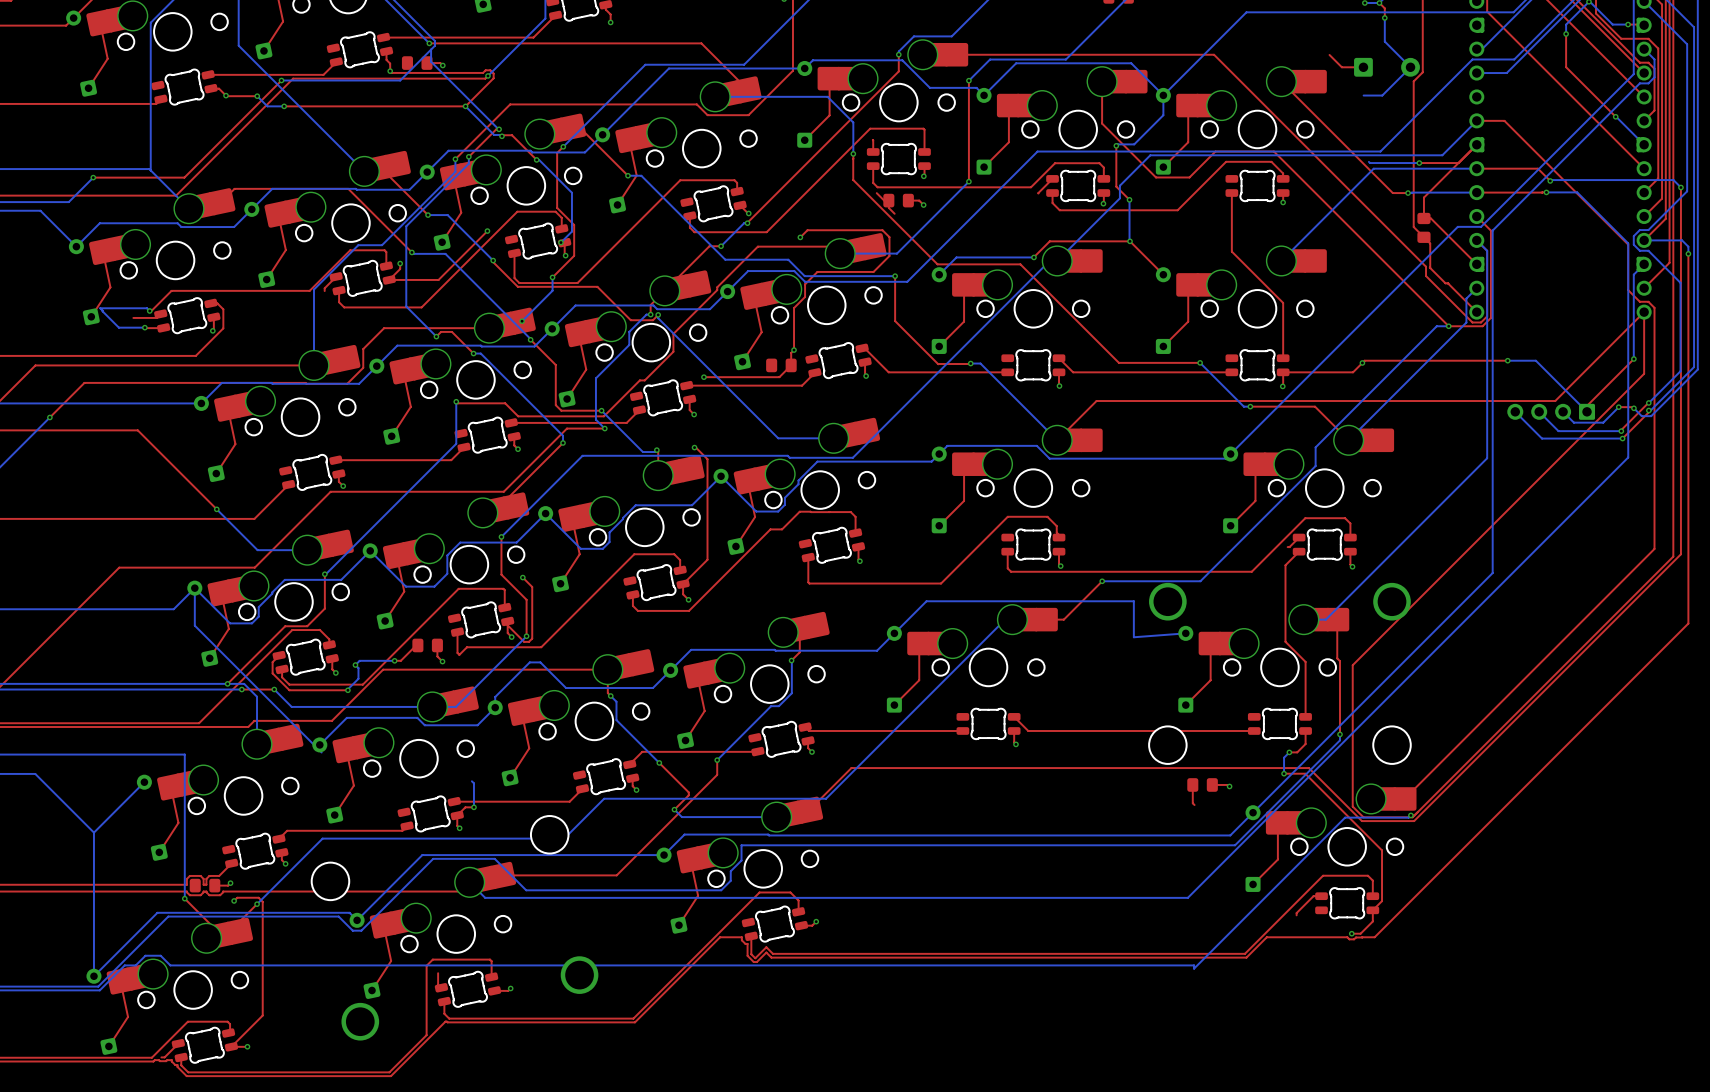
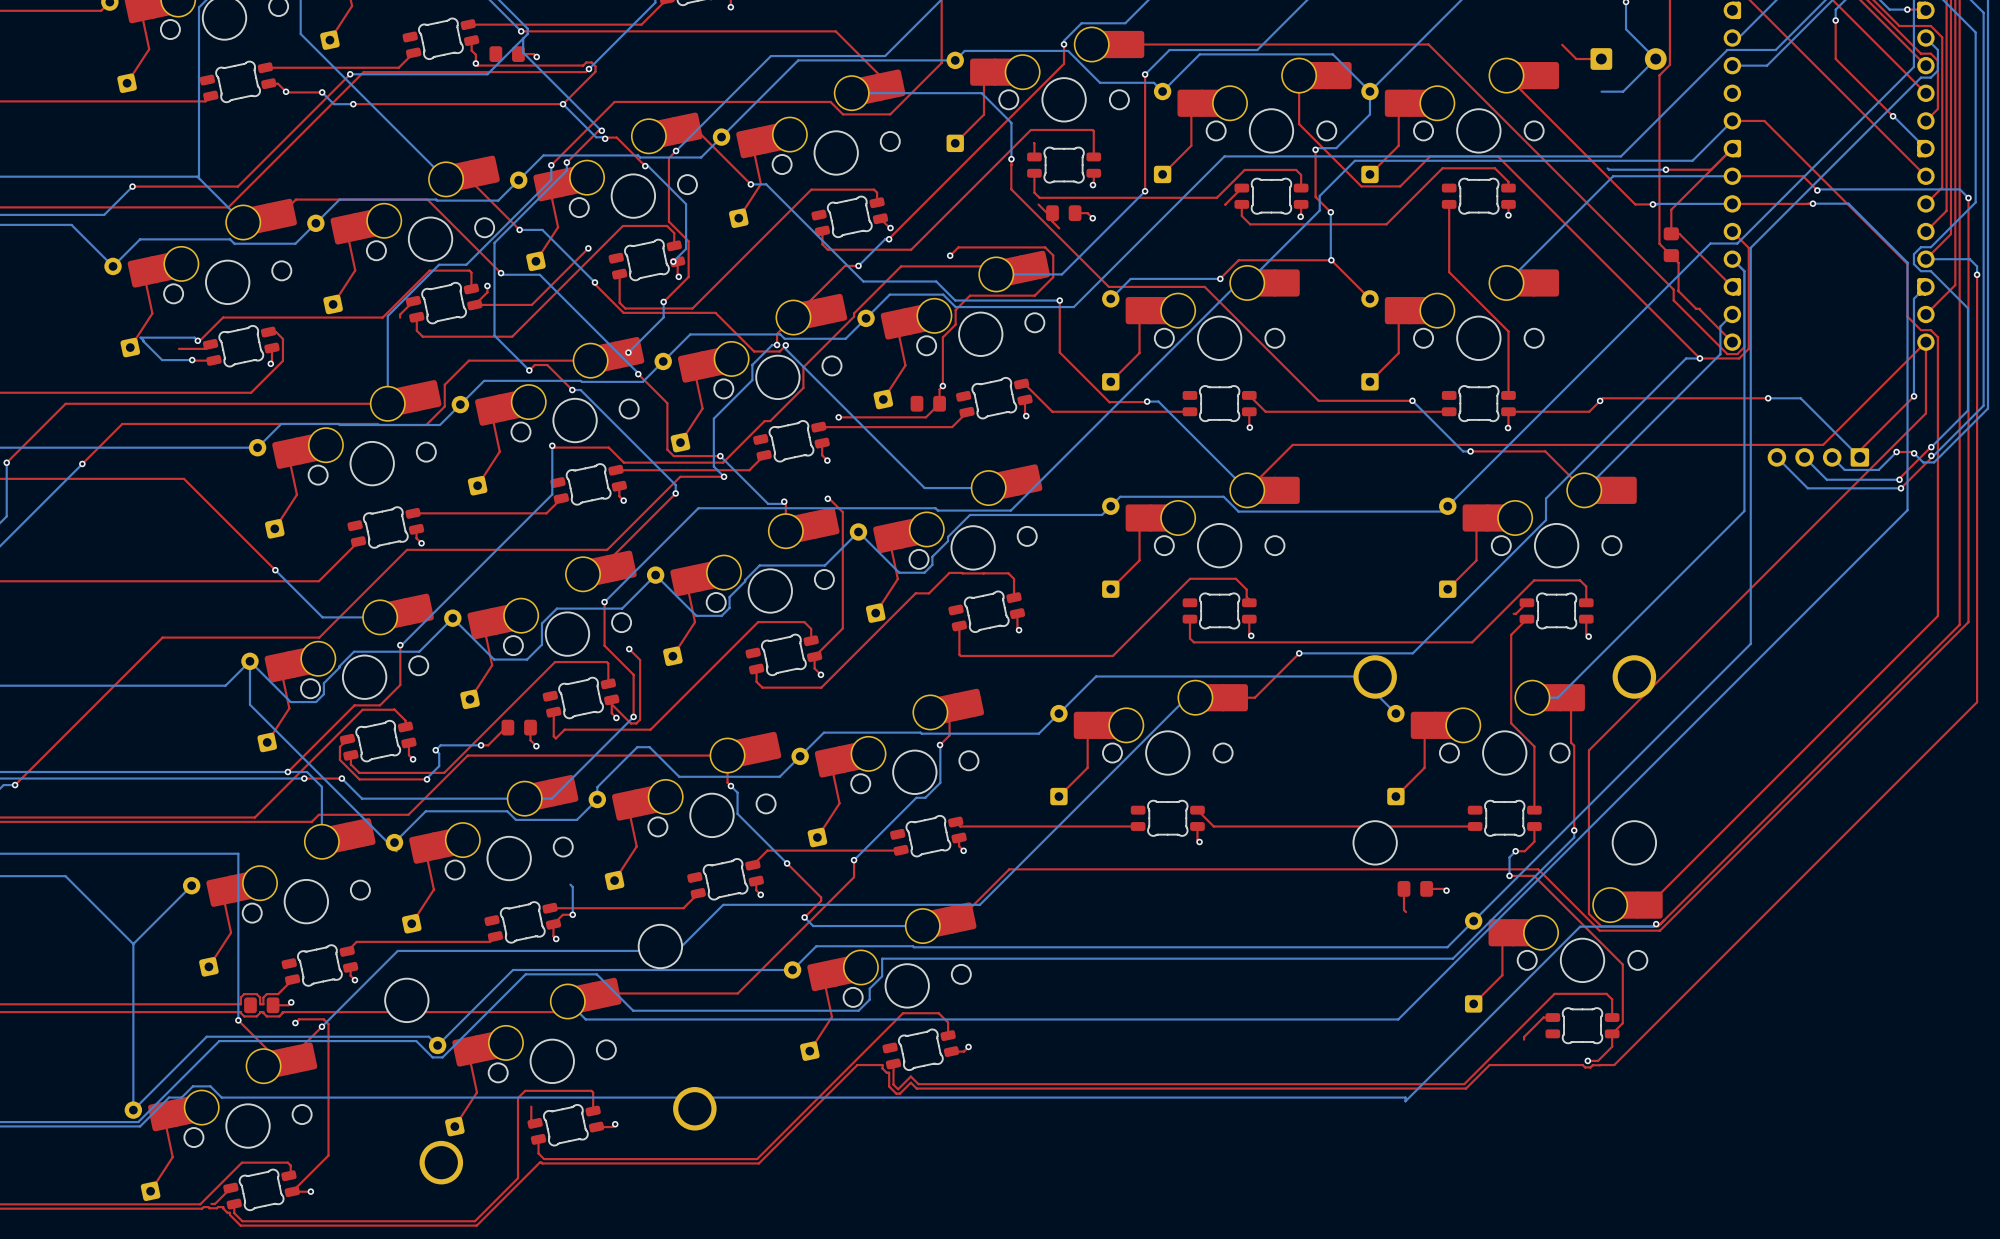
bottom track: (1133, 601) (1133, 637) (1185, 633) -> (1335, 676) (1358, 676) (1395, 713)

